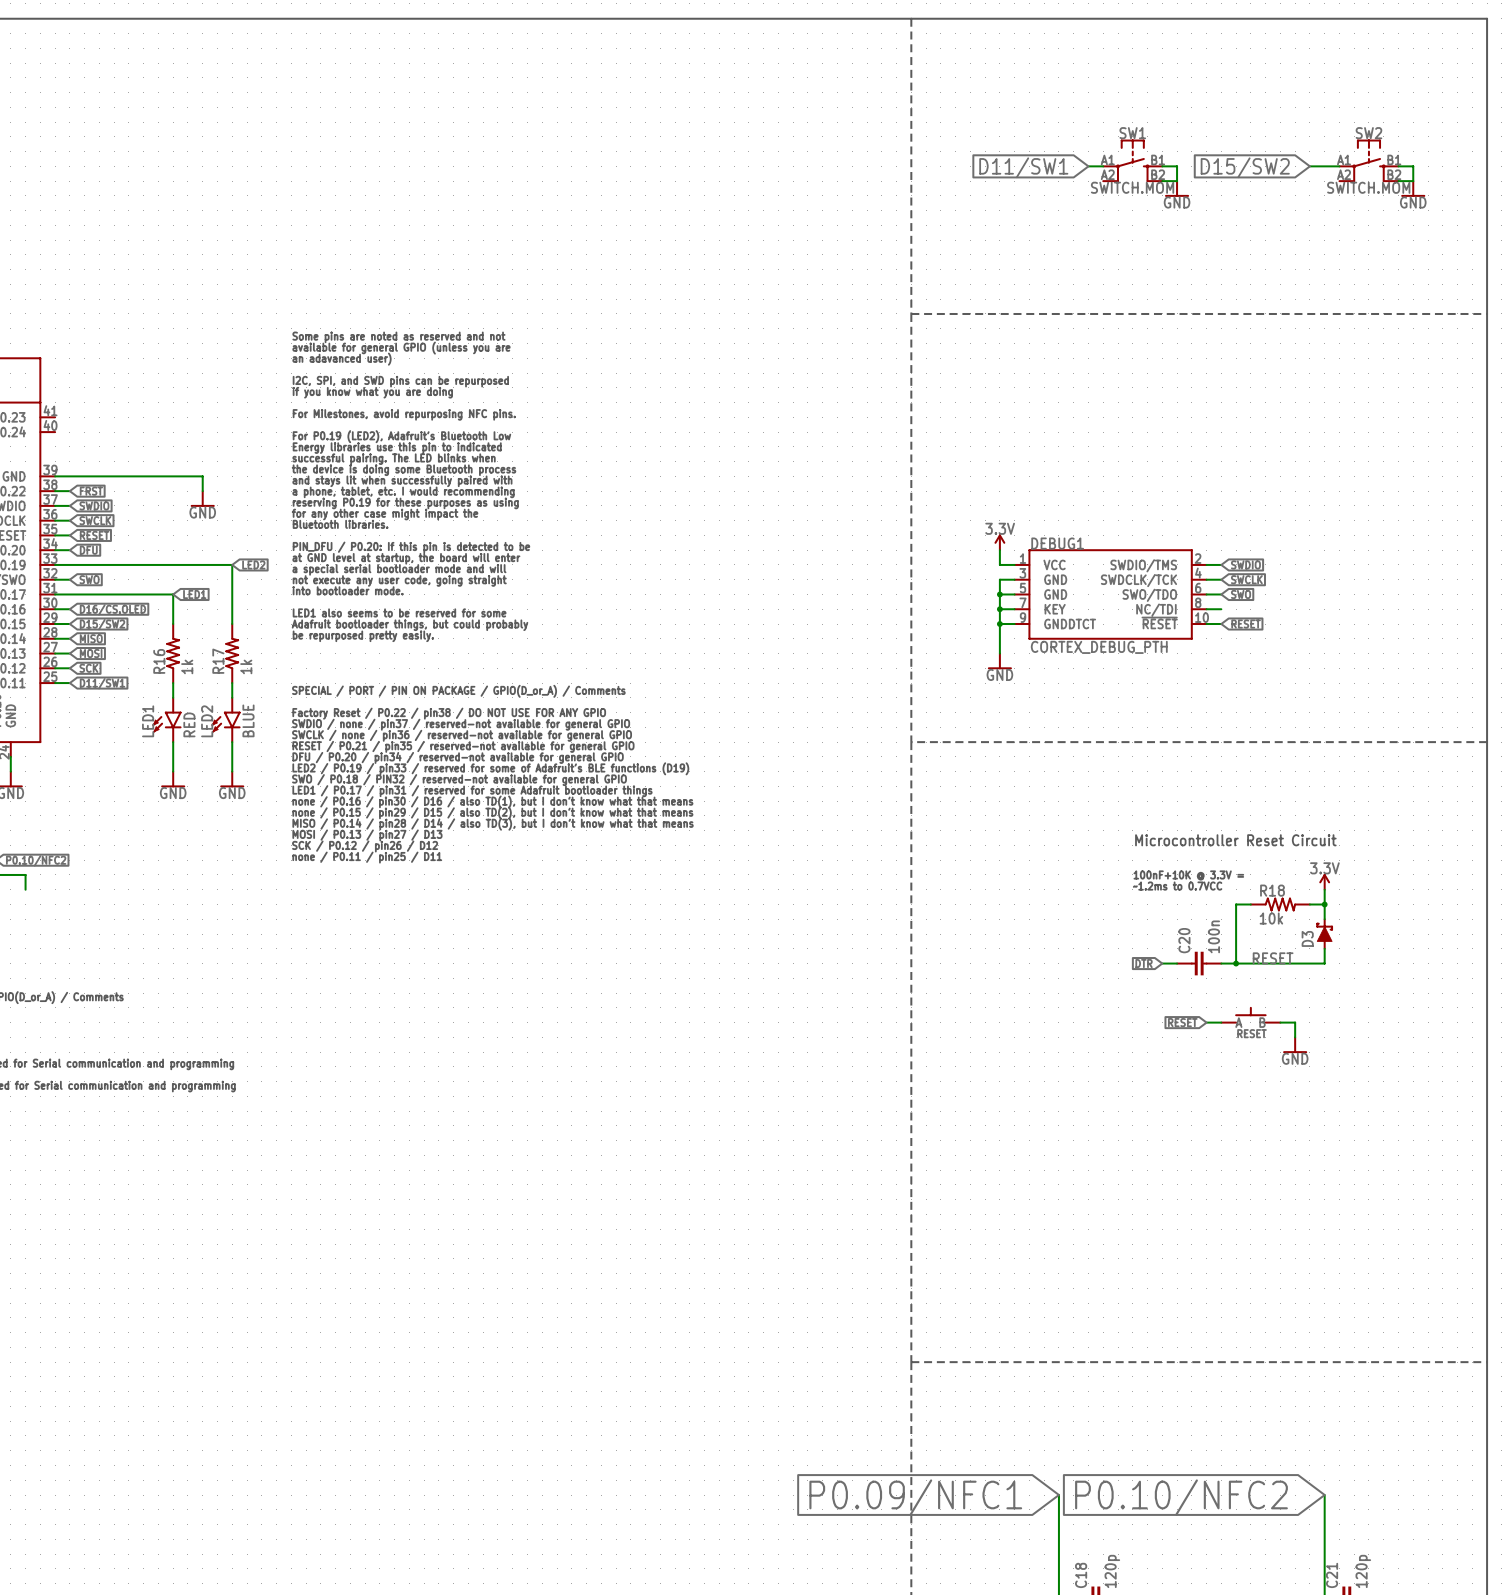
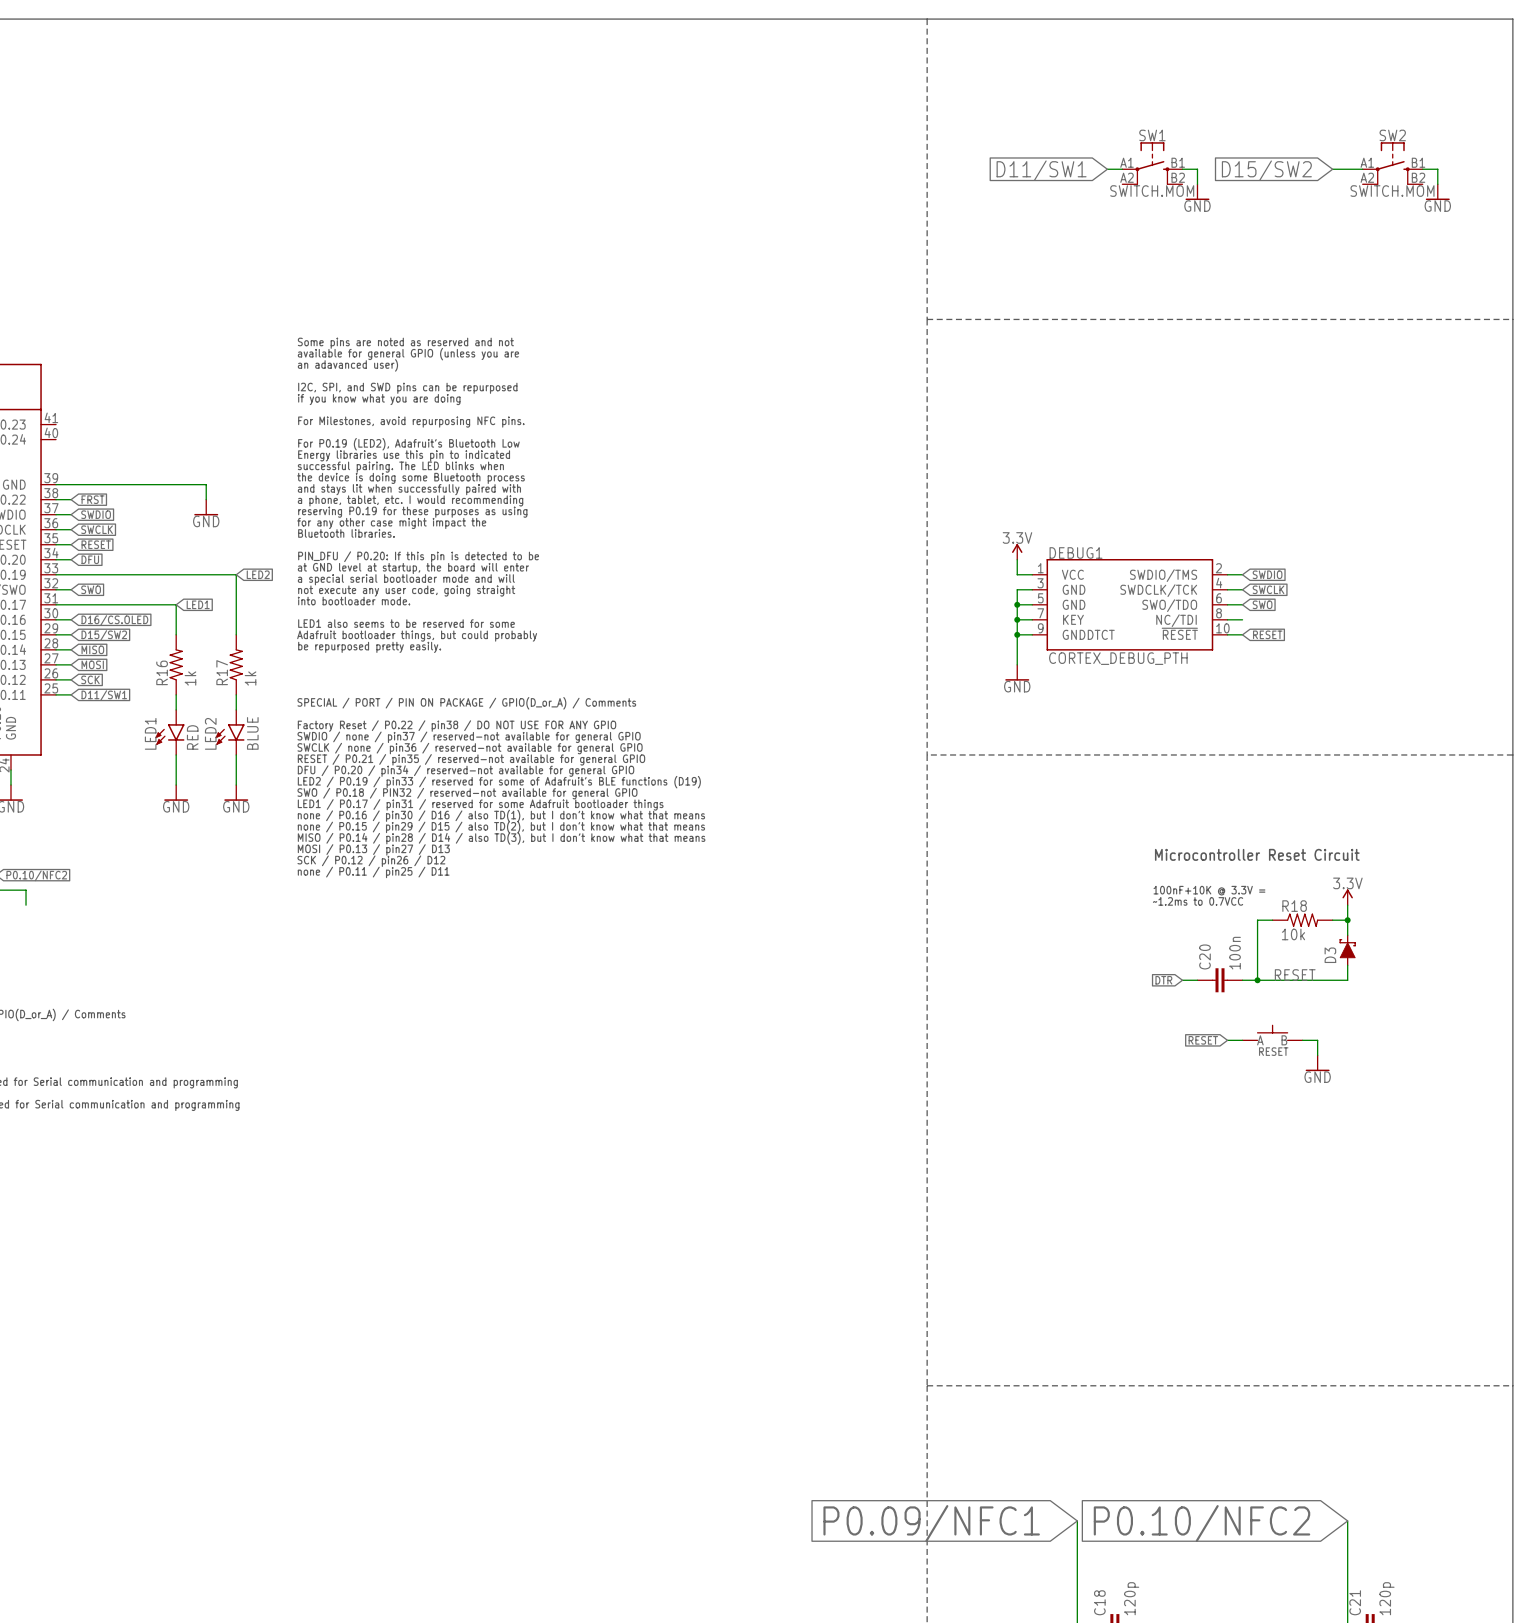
wire: (1162, 181) (1177, 181) -> none
wire: (1398, 181) (1413, 181) -> none

